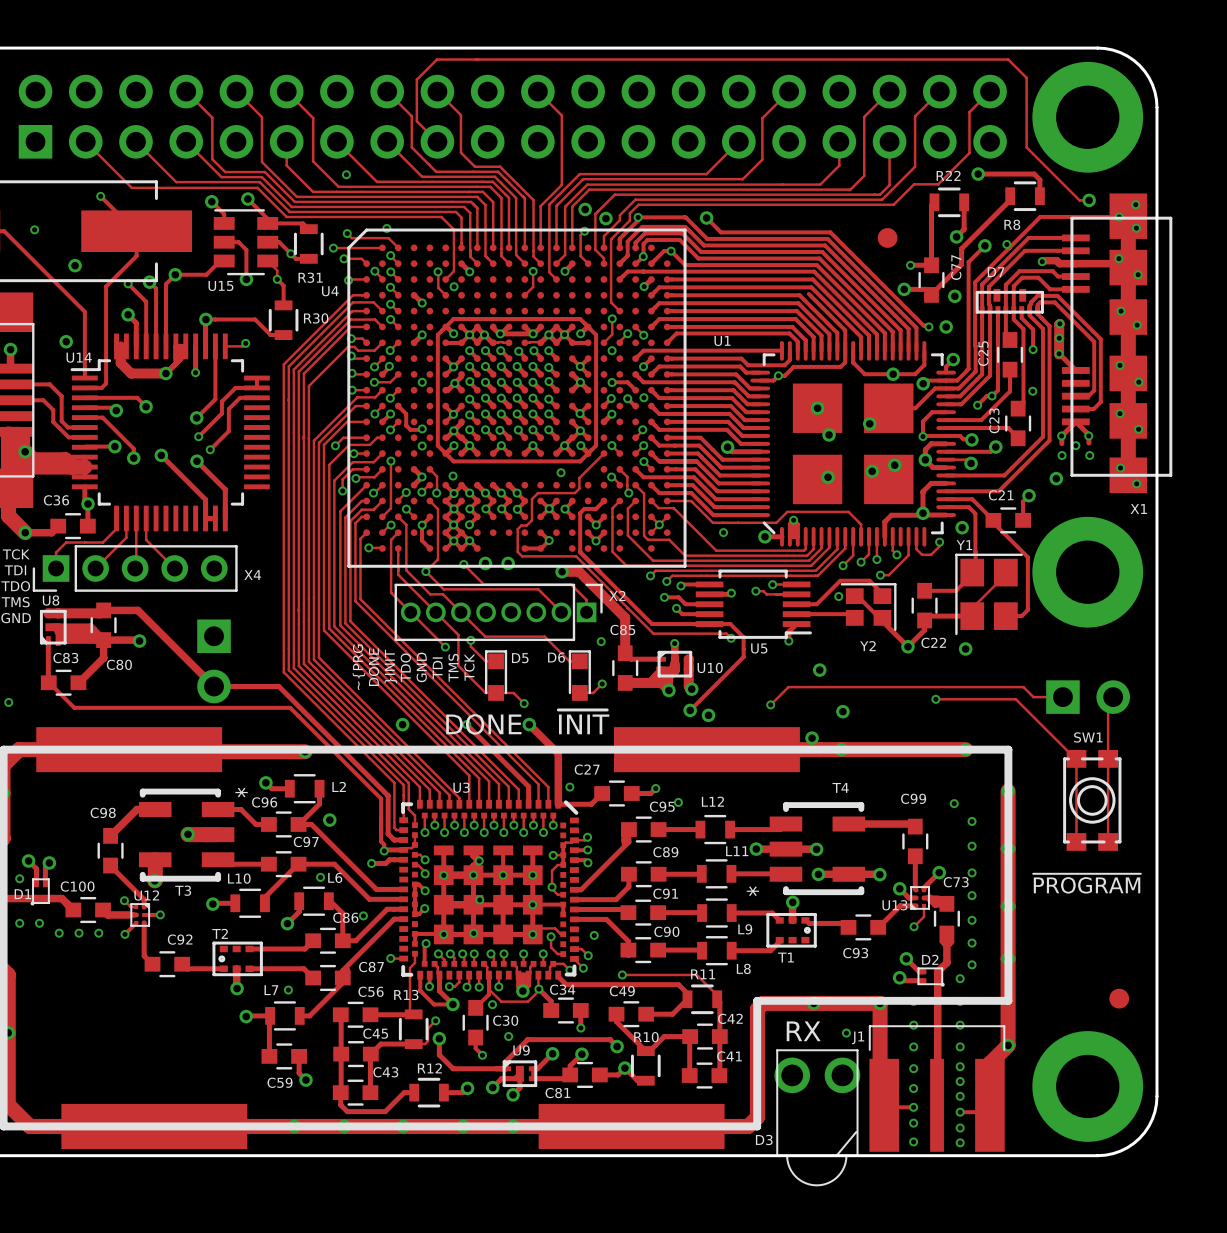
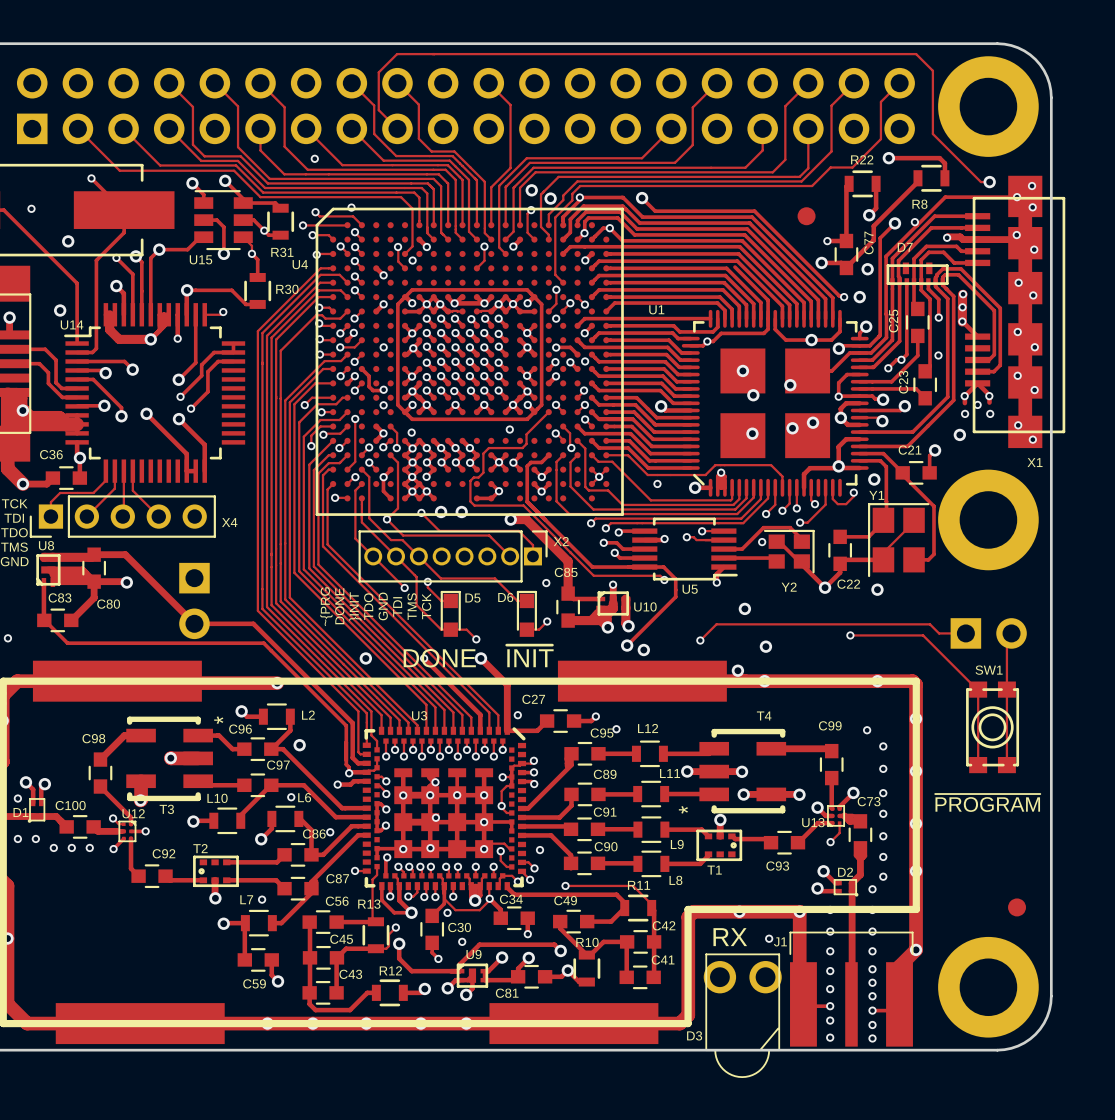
track: none -> (877, 681) (912, 681) (916, 684) (916, 718)

